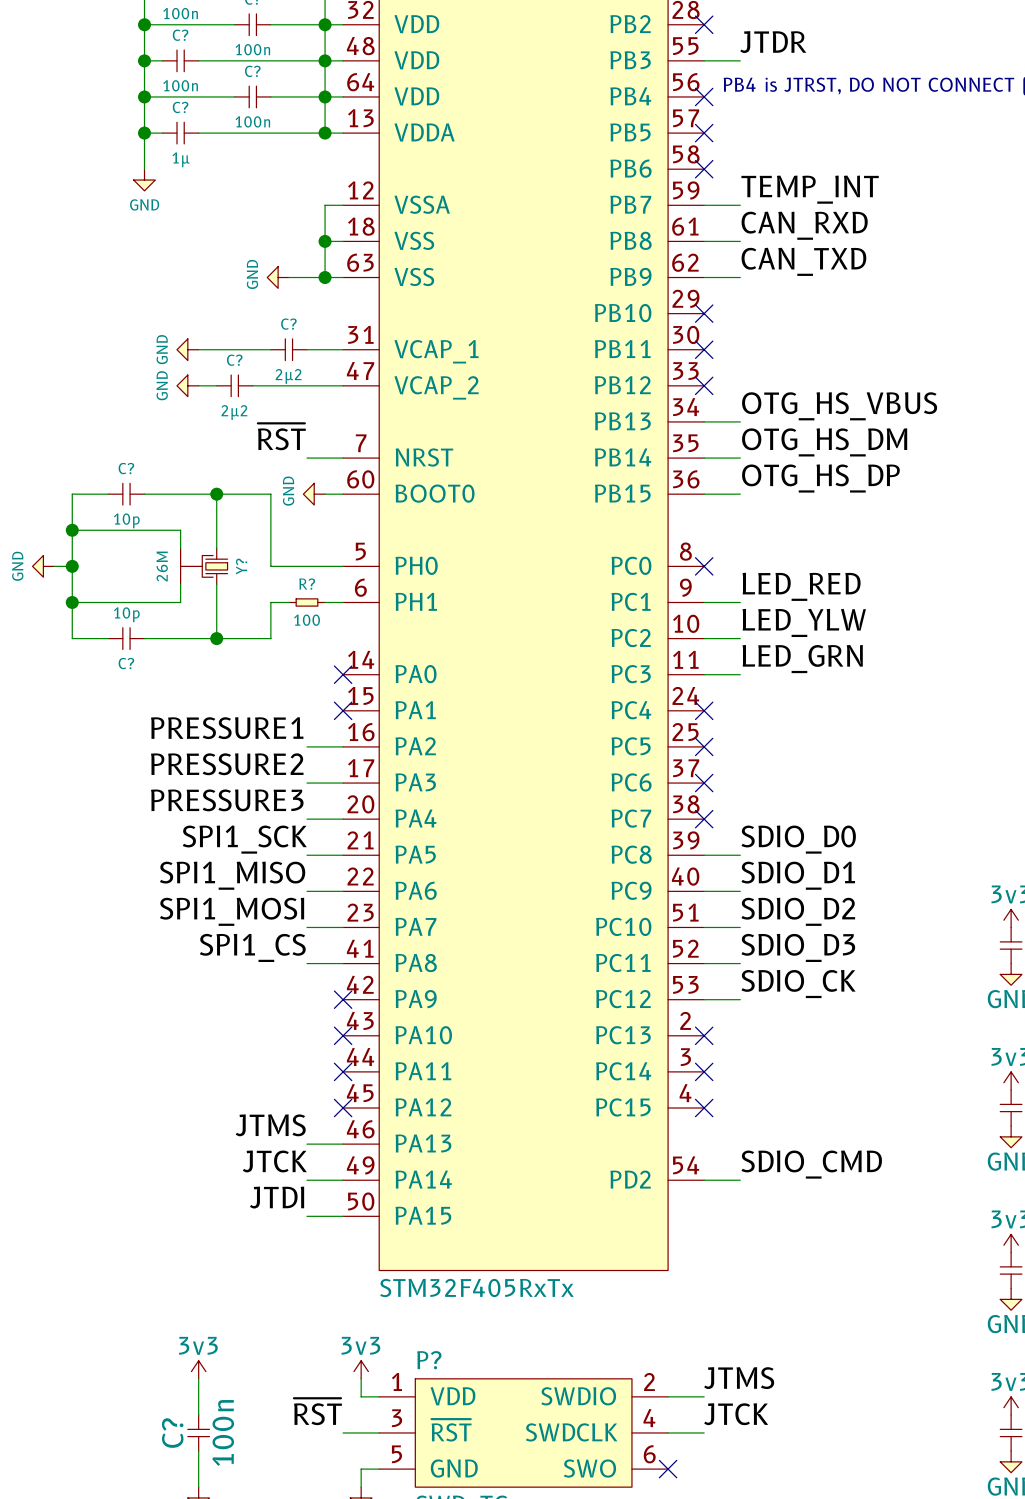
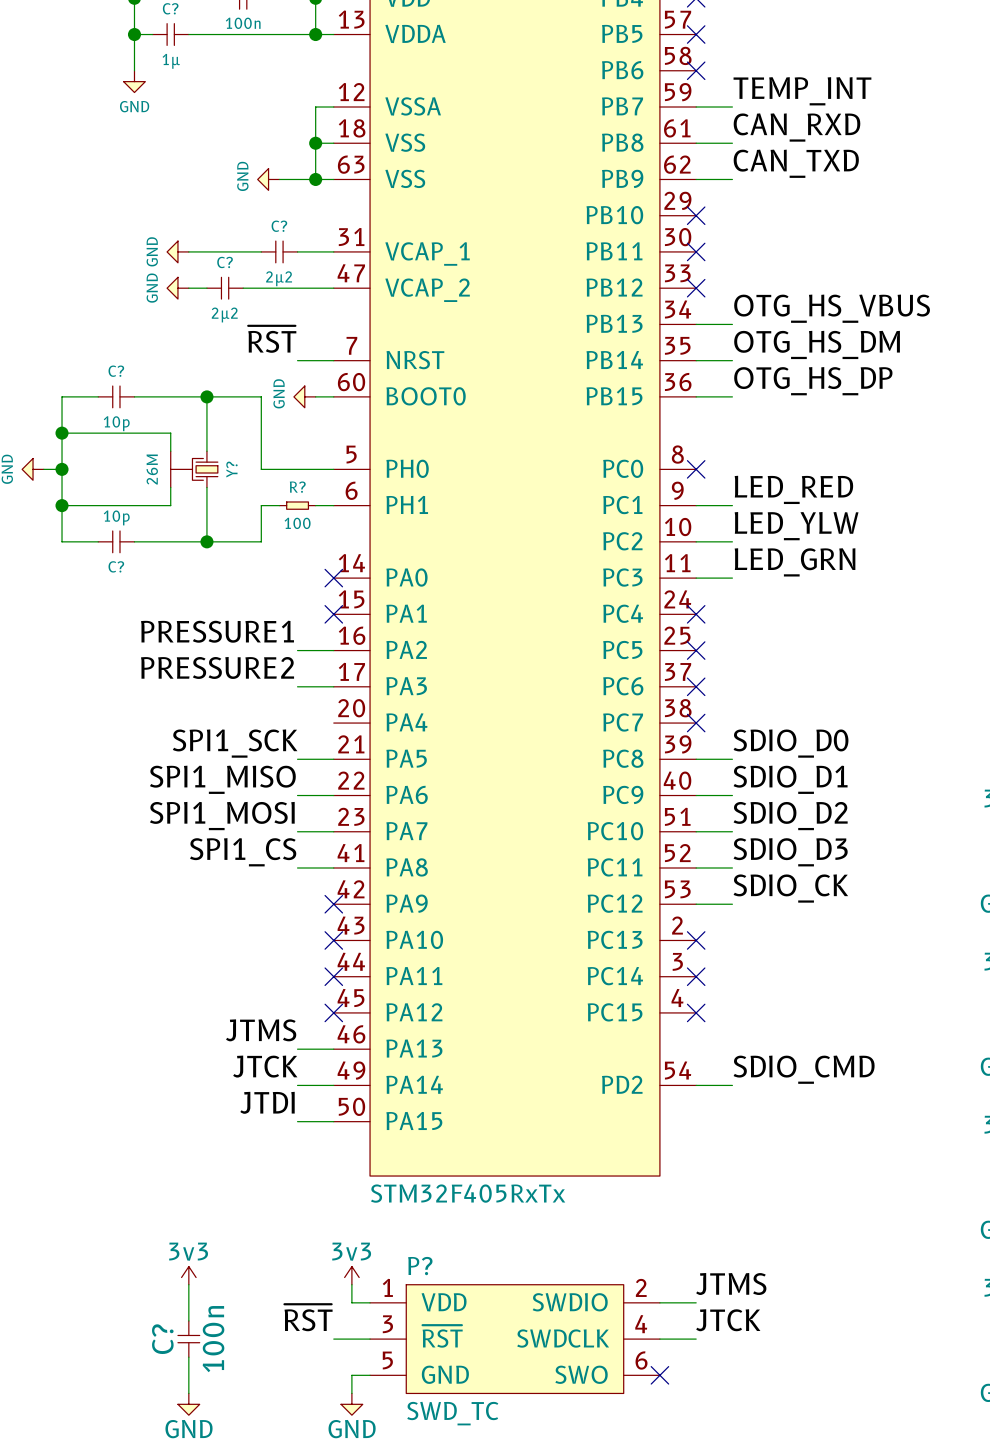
label: PRESSURE3 (227, 800) -> none
wire: (306, 819) (343, 819) -> none

